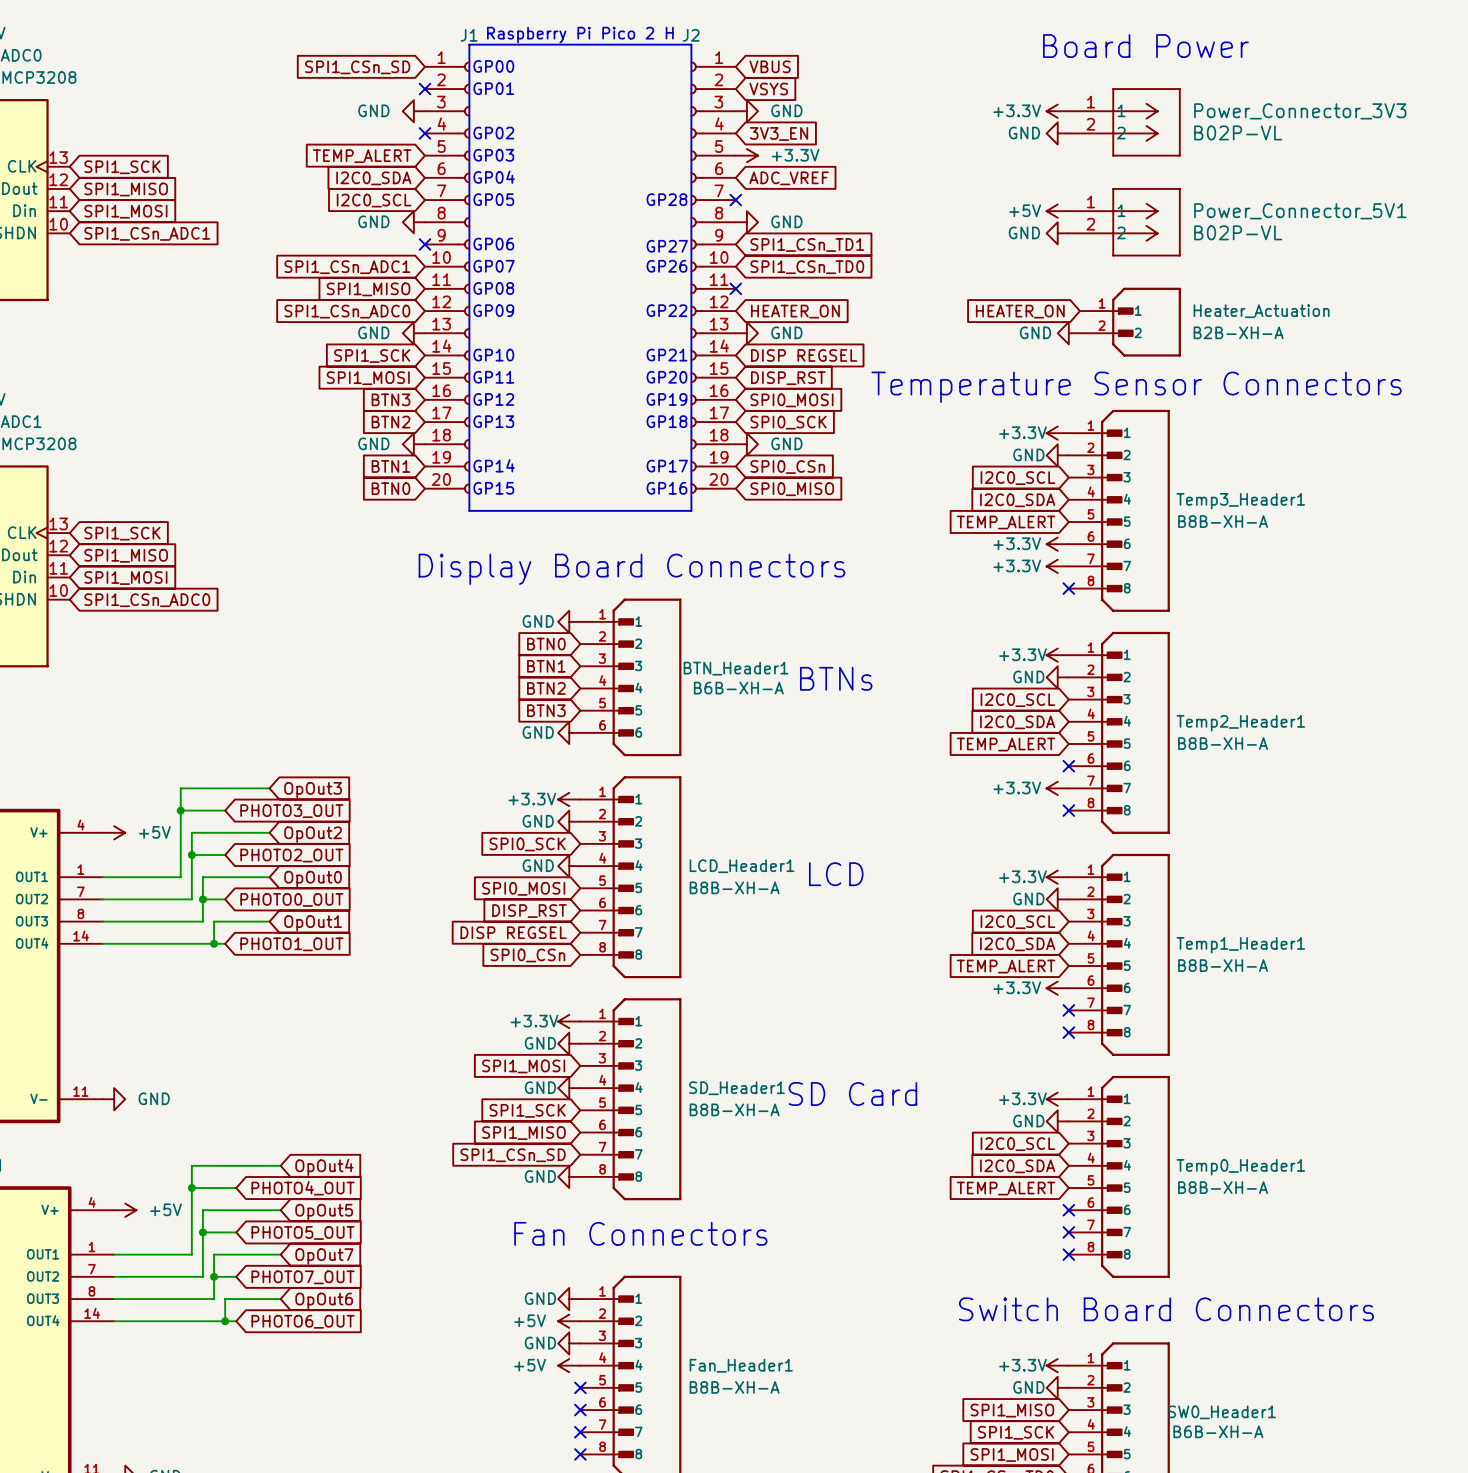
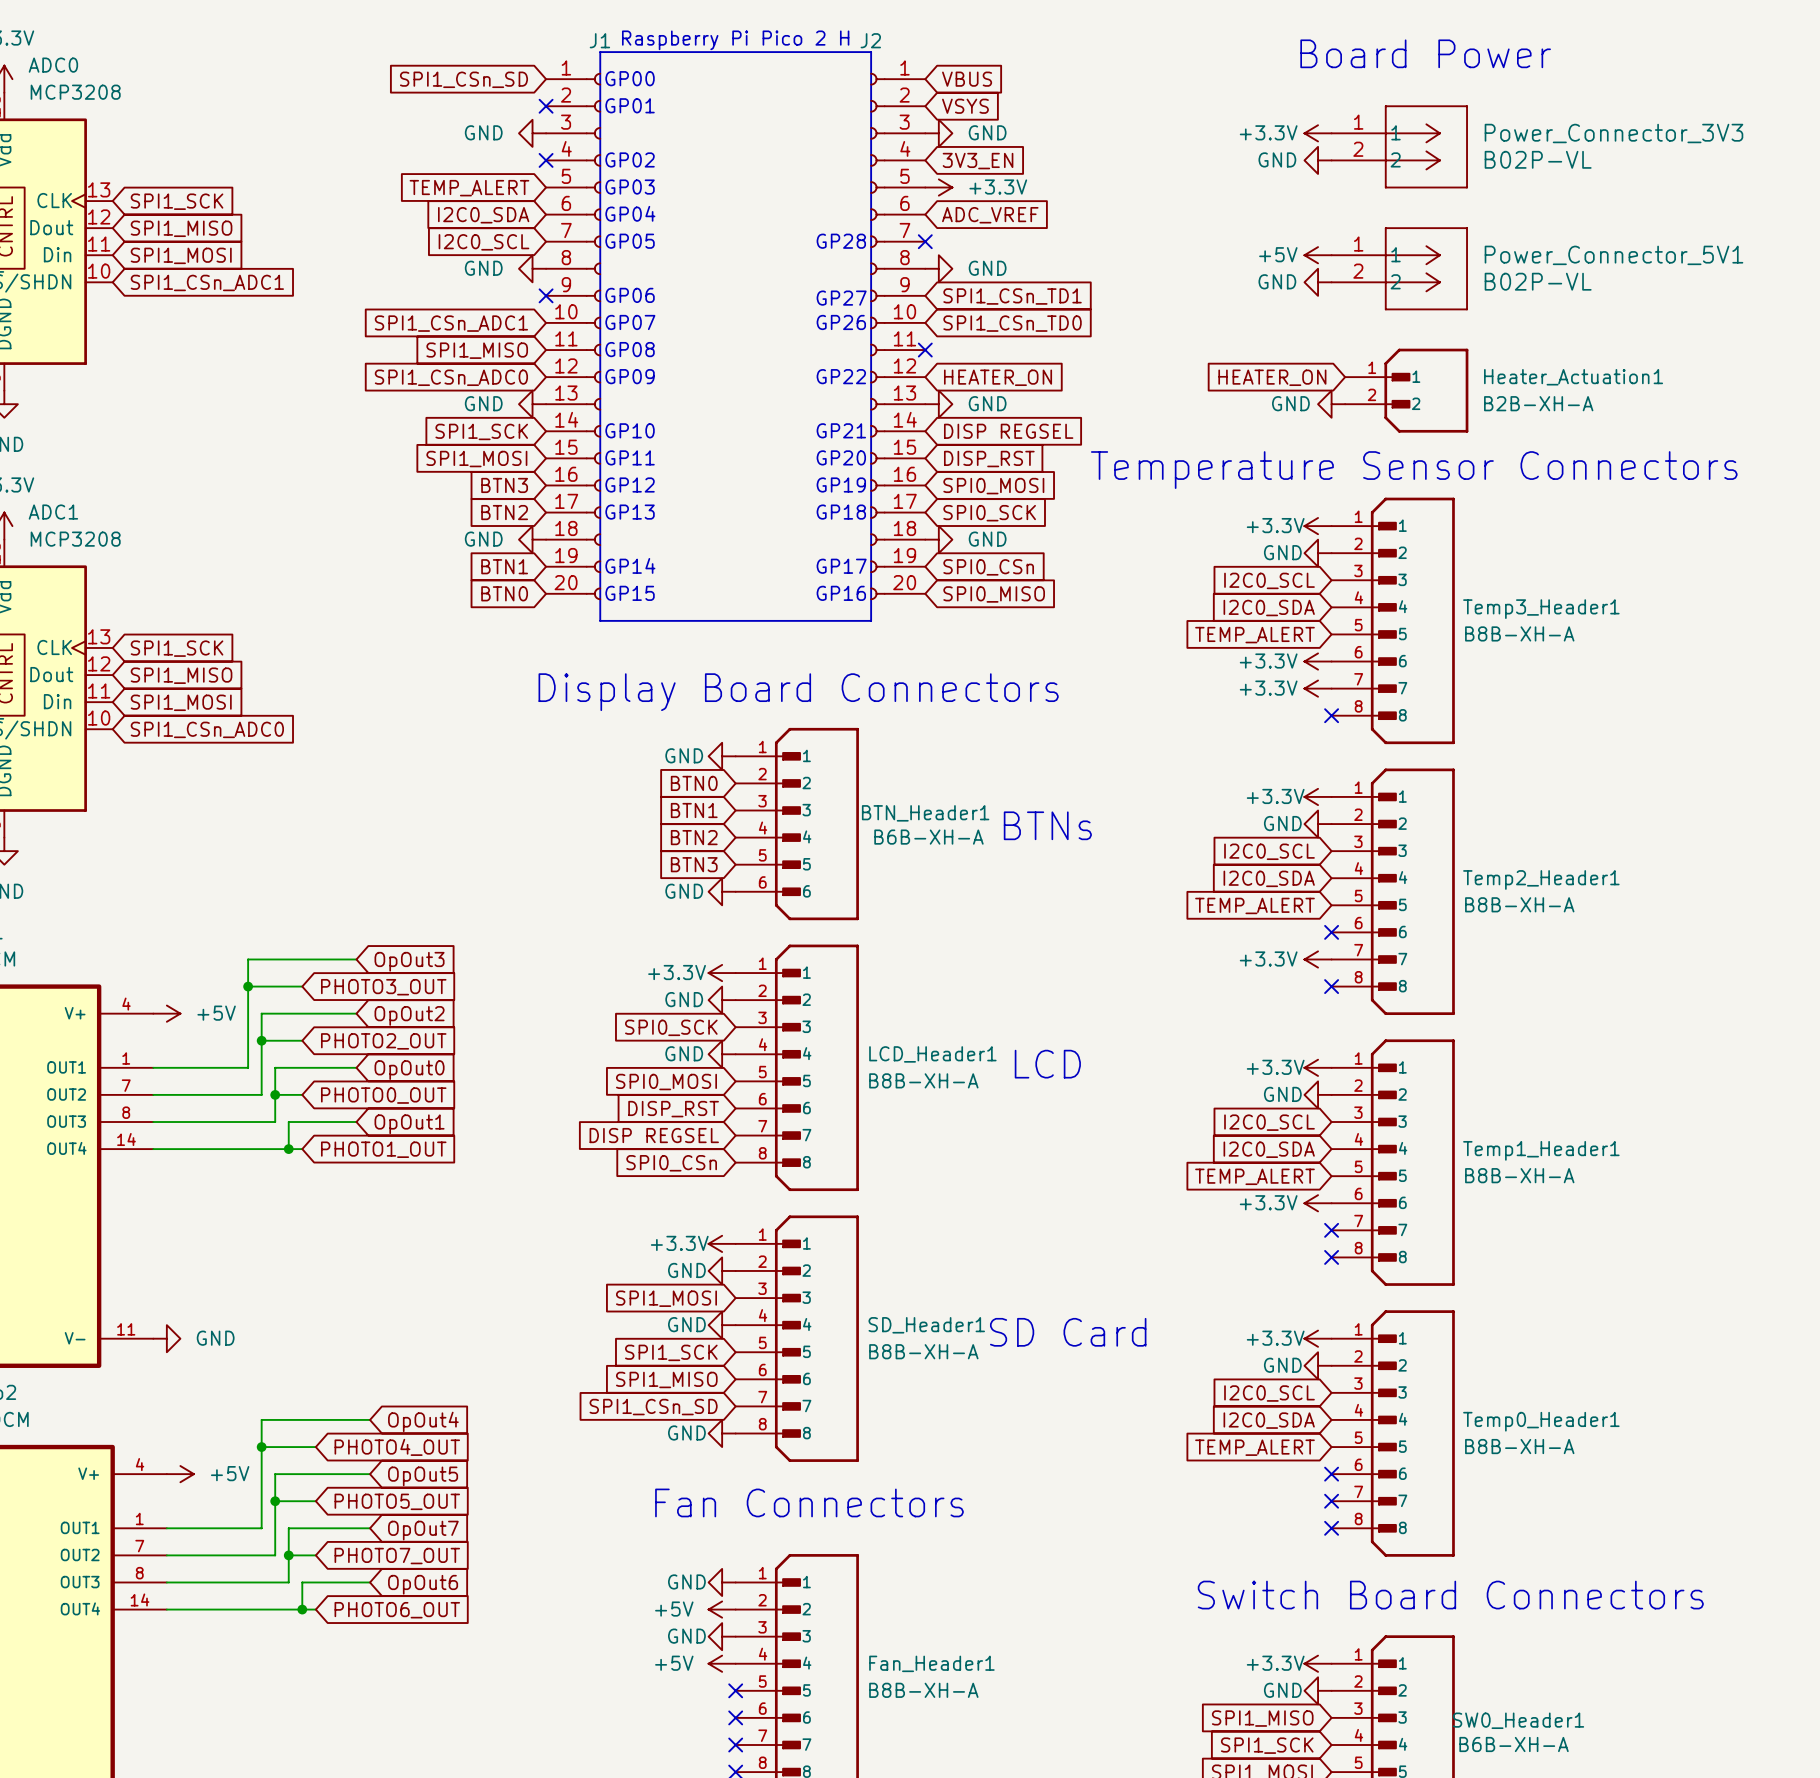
Heater_Actuation name: Heater_Actuation (1261, 311) -> Heater_Actuation1 (1573, 377)

